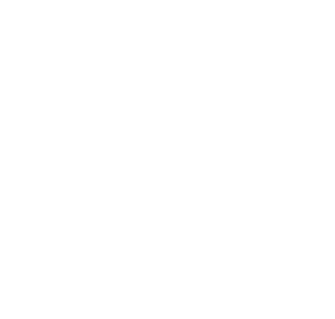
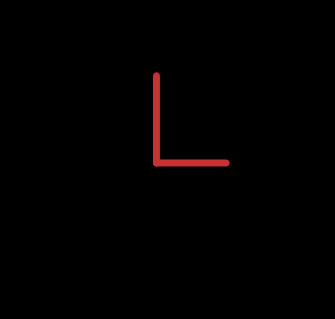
top track: none -> (156, 75) (156, 162) (226, 162)

